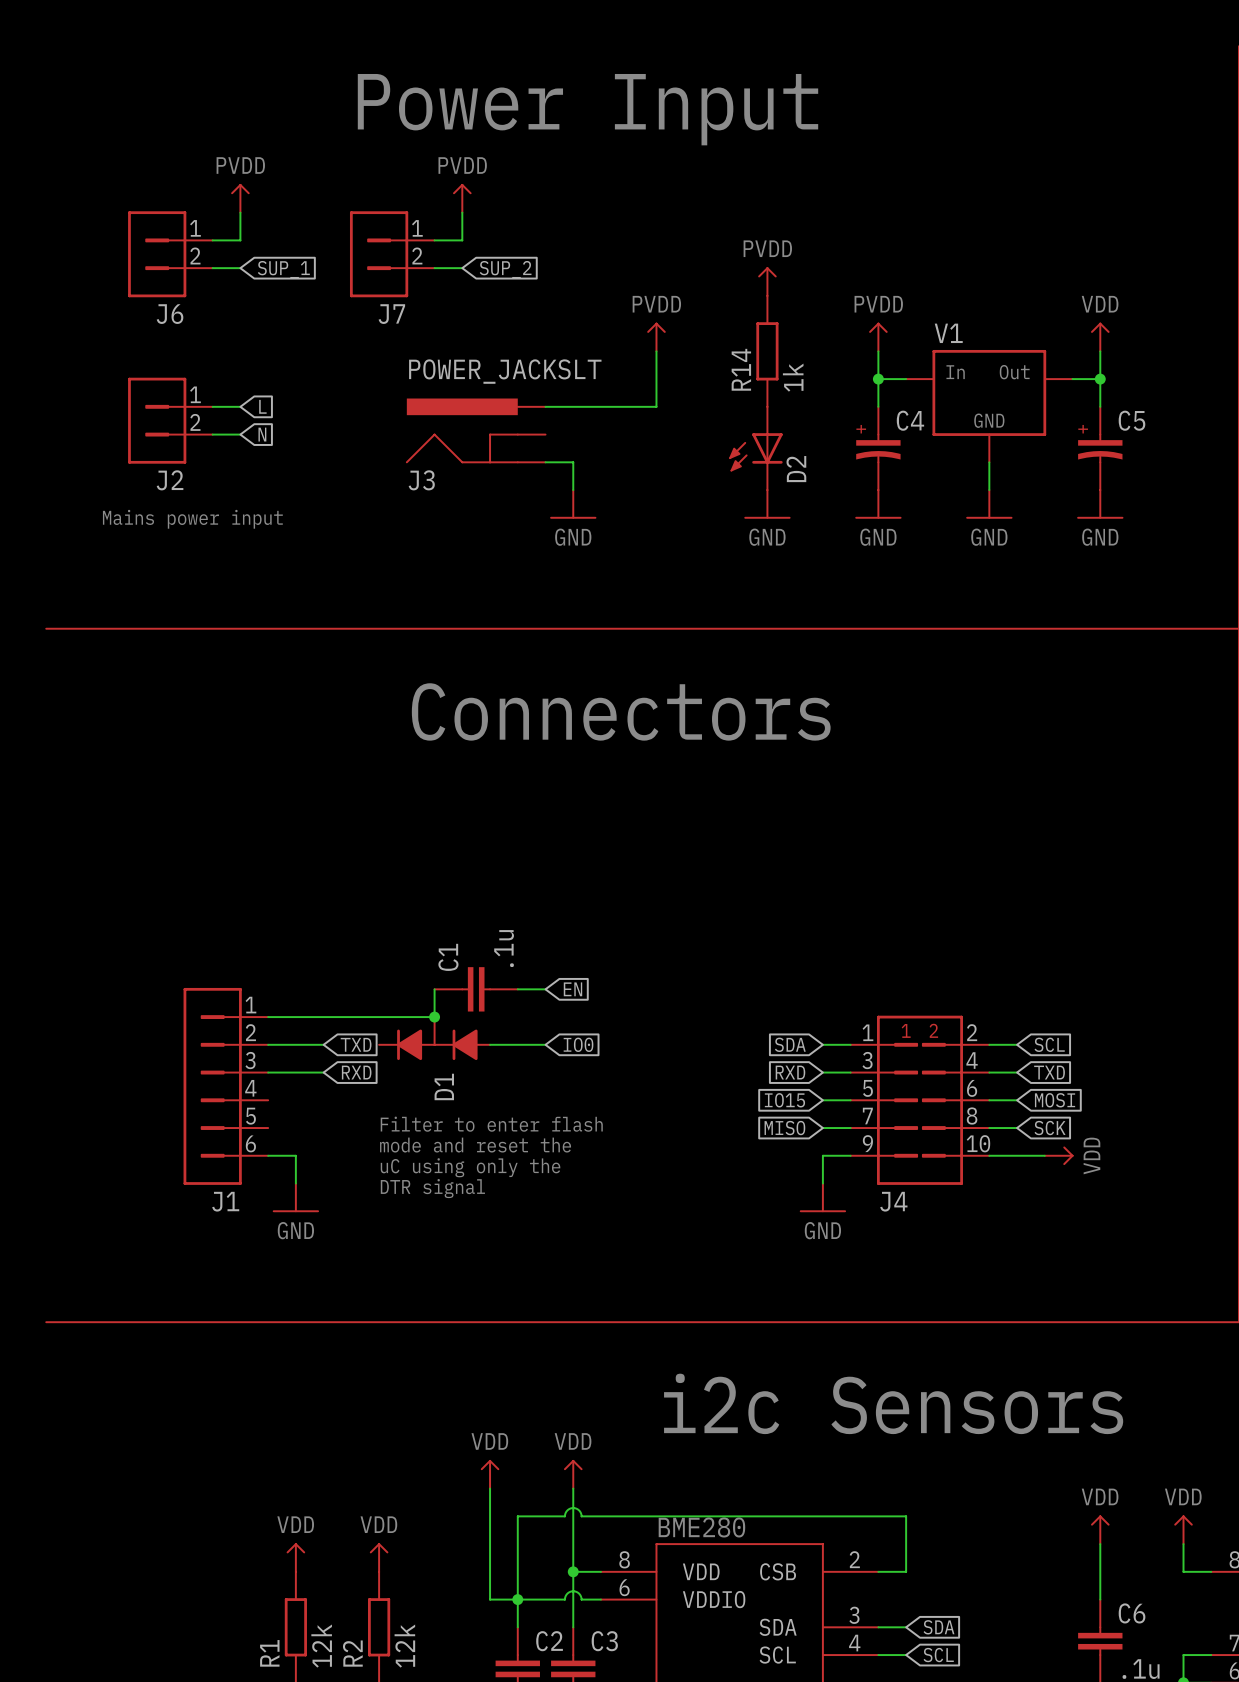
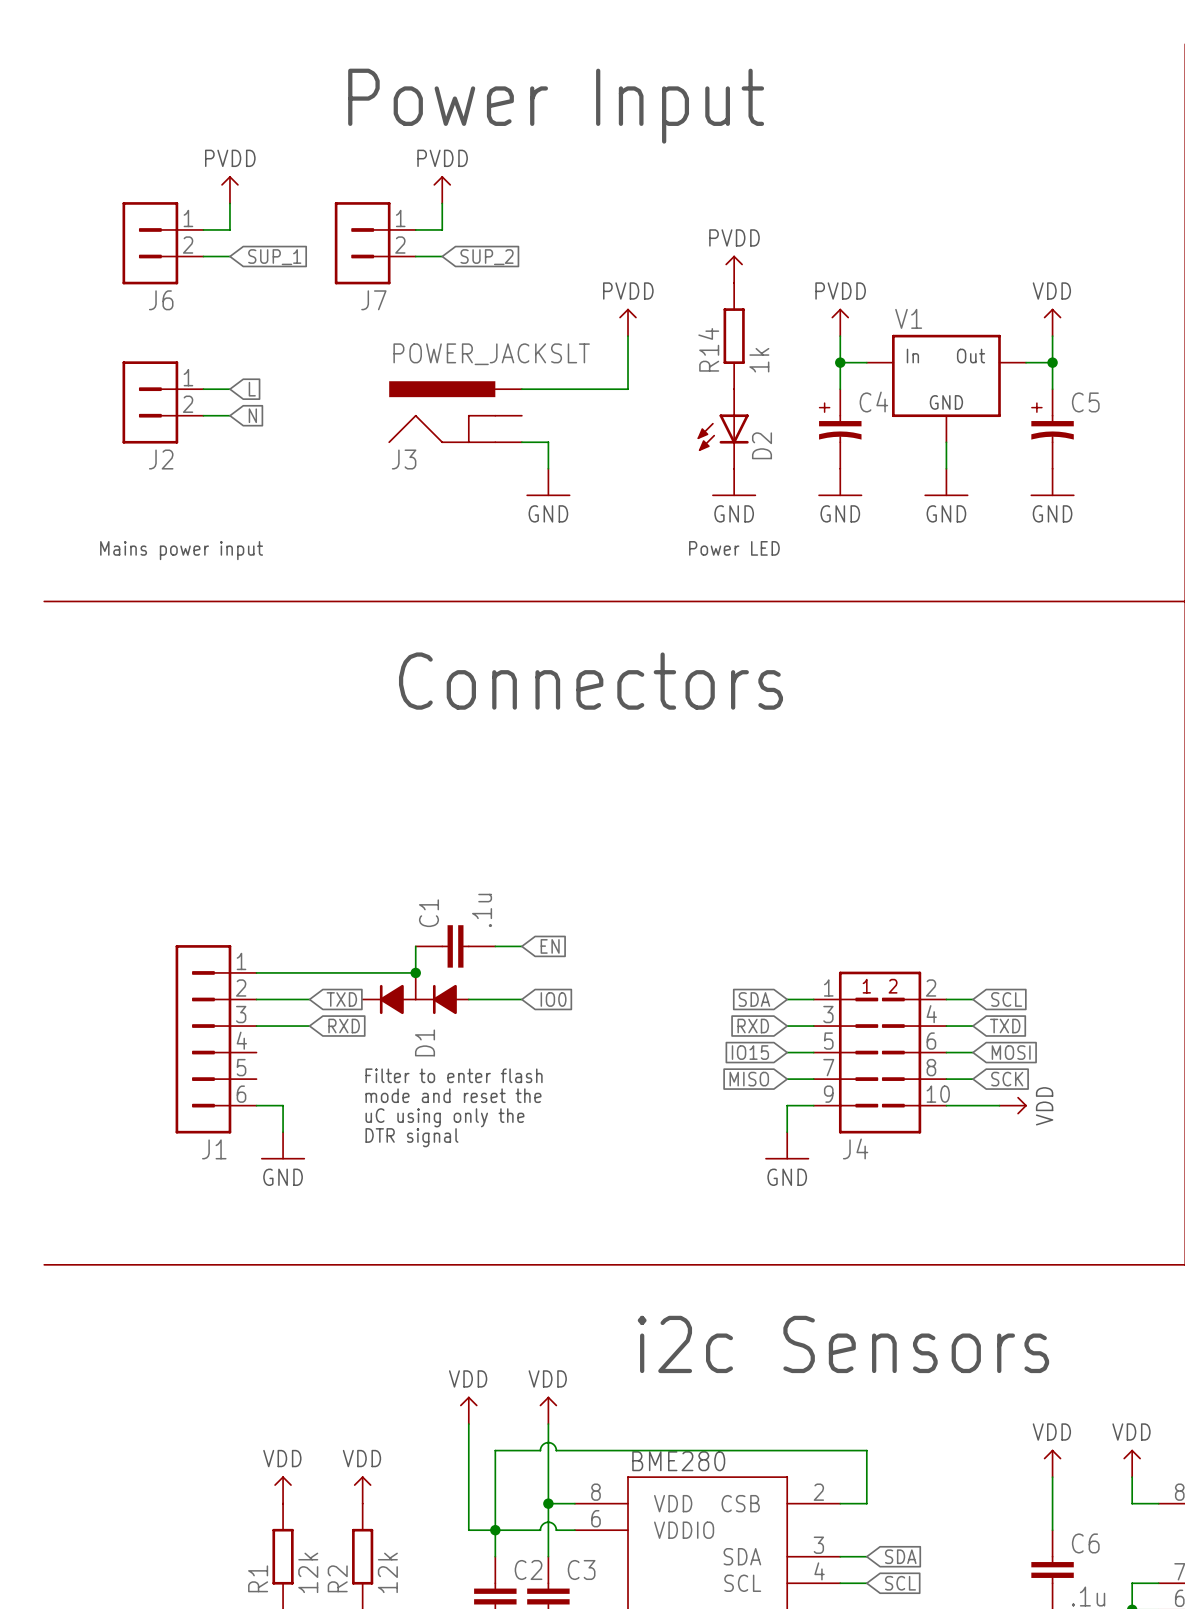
text position: Mains power input (192, 519) -> Mains power input (181, 550)
text: none -> Power LED (734, 548)

